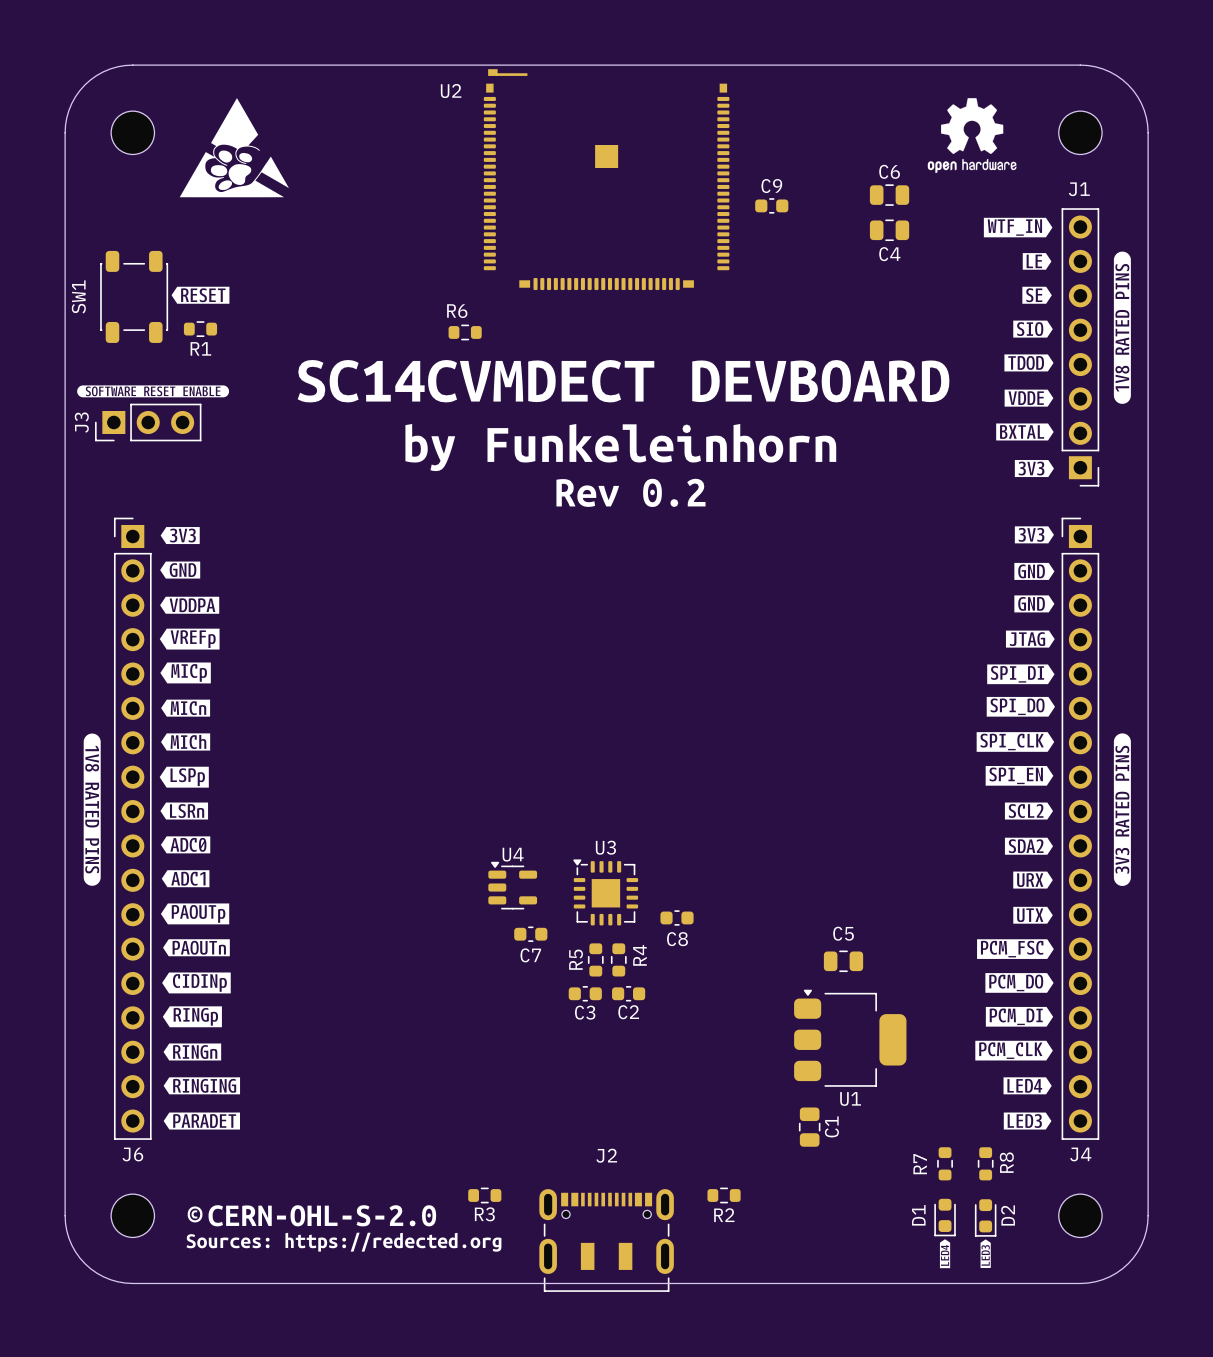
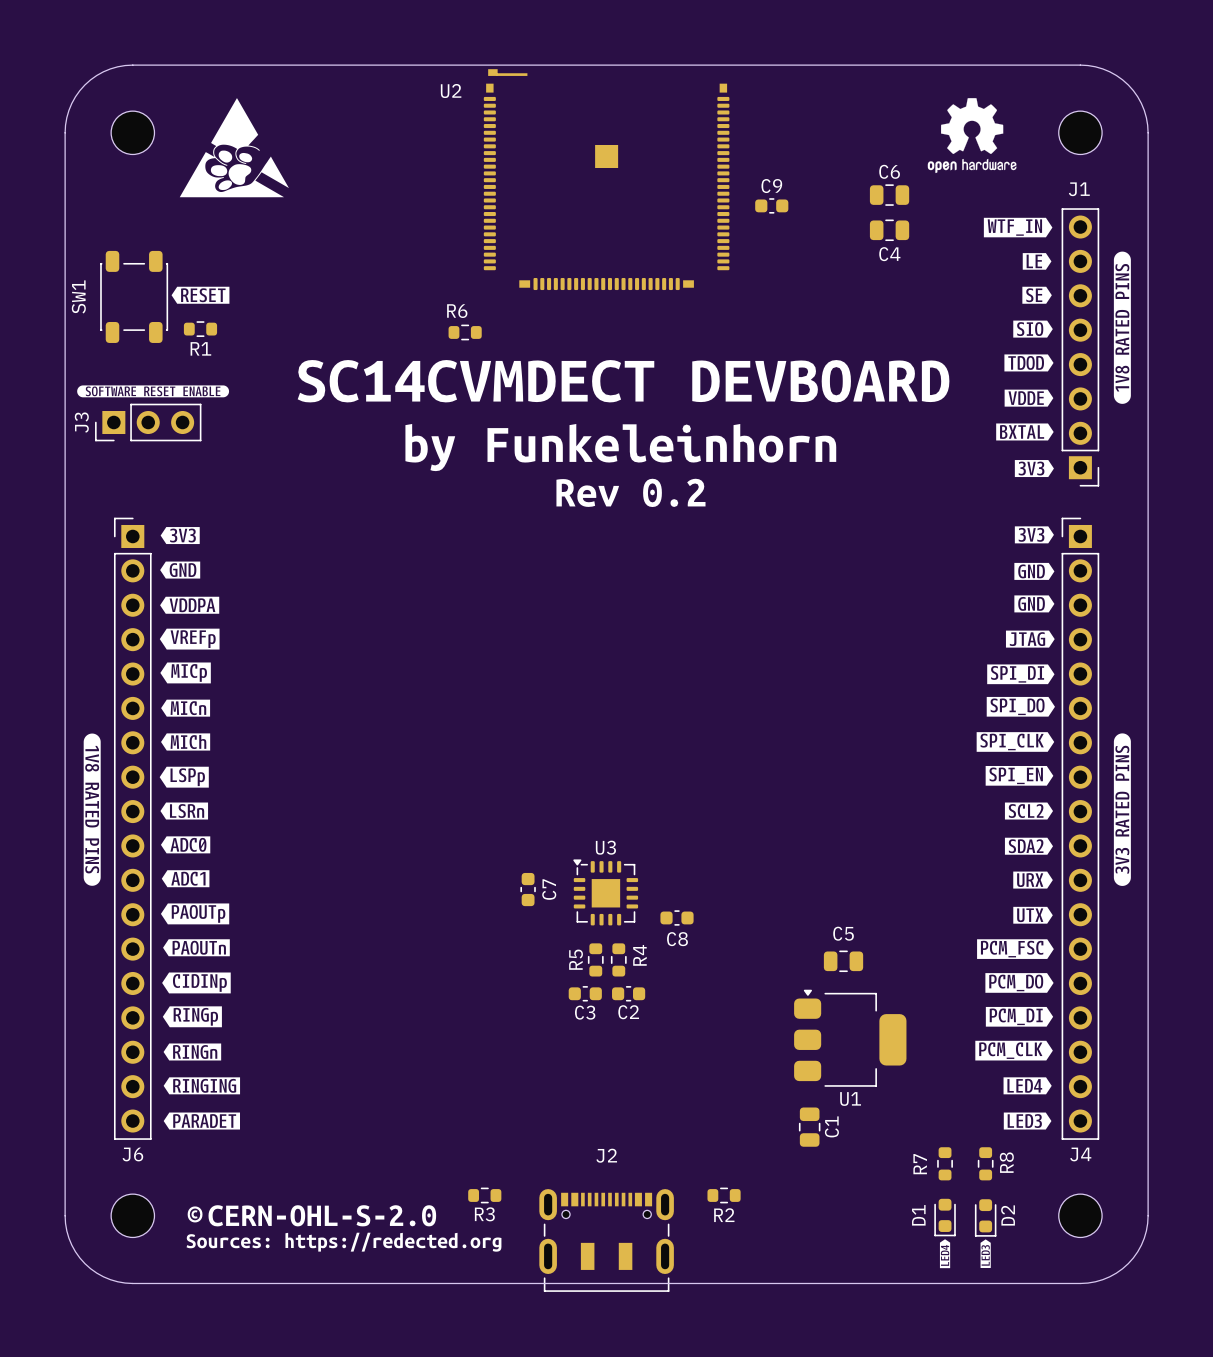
U4: (512, 885) -> none
C7 rotation: 0° (530, 934) -> 90° clockwise (528, 889)
C7 position: (530, 934) -> (528, 889)
C7 name position: C7 (530, 955) -> C7 (549, 889)

